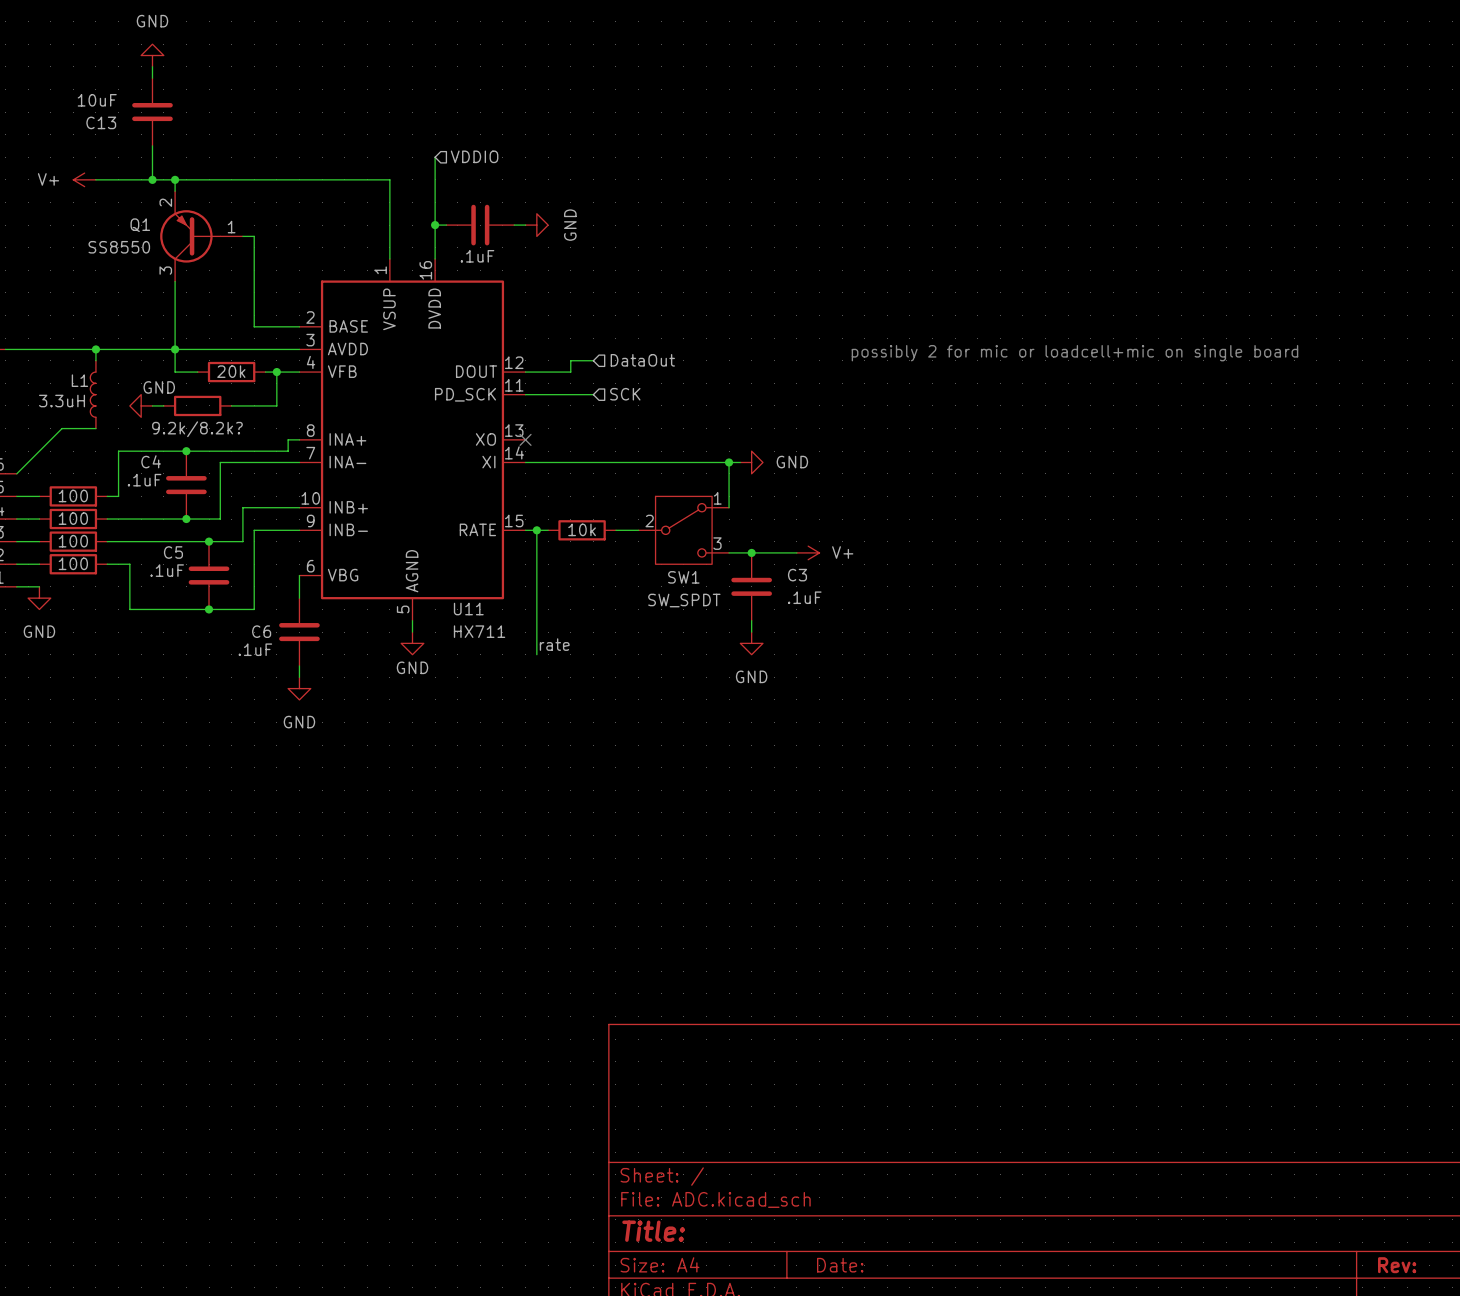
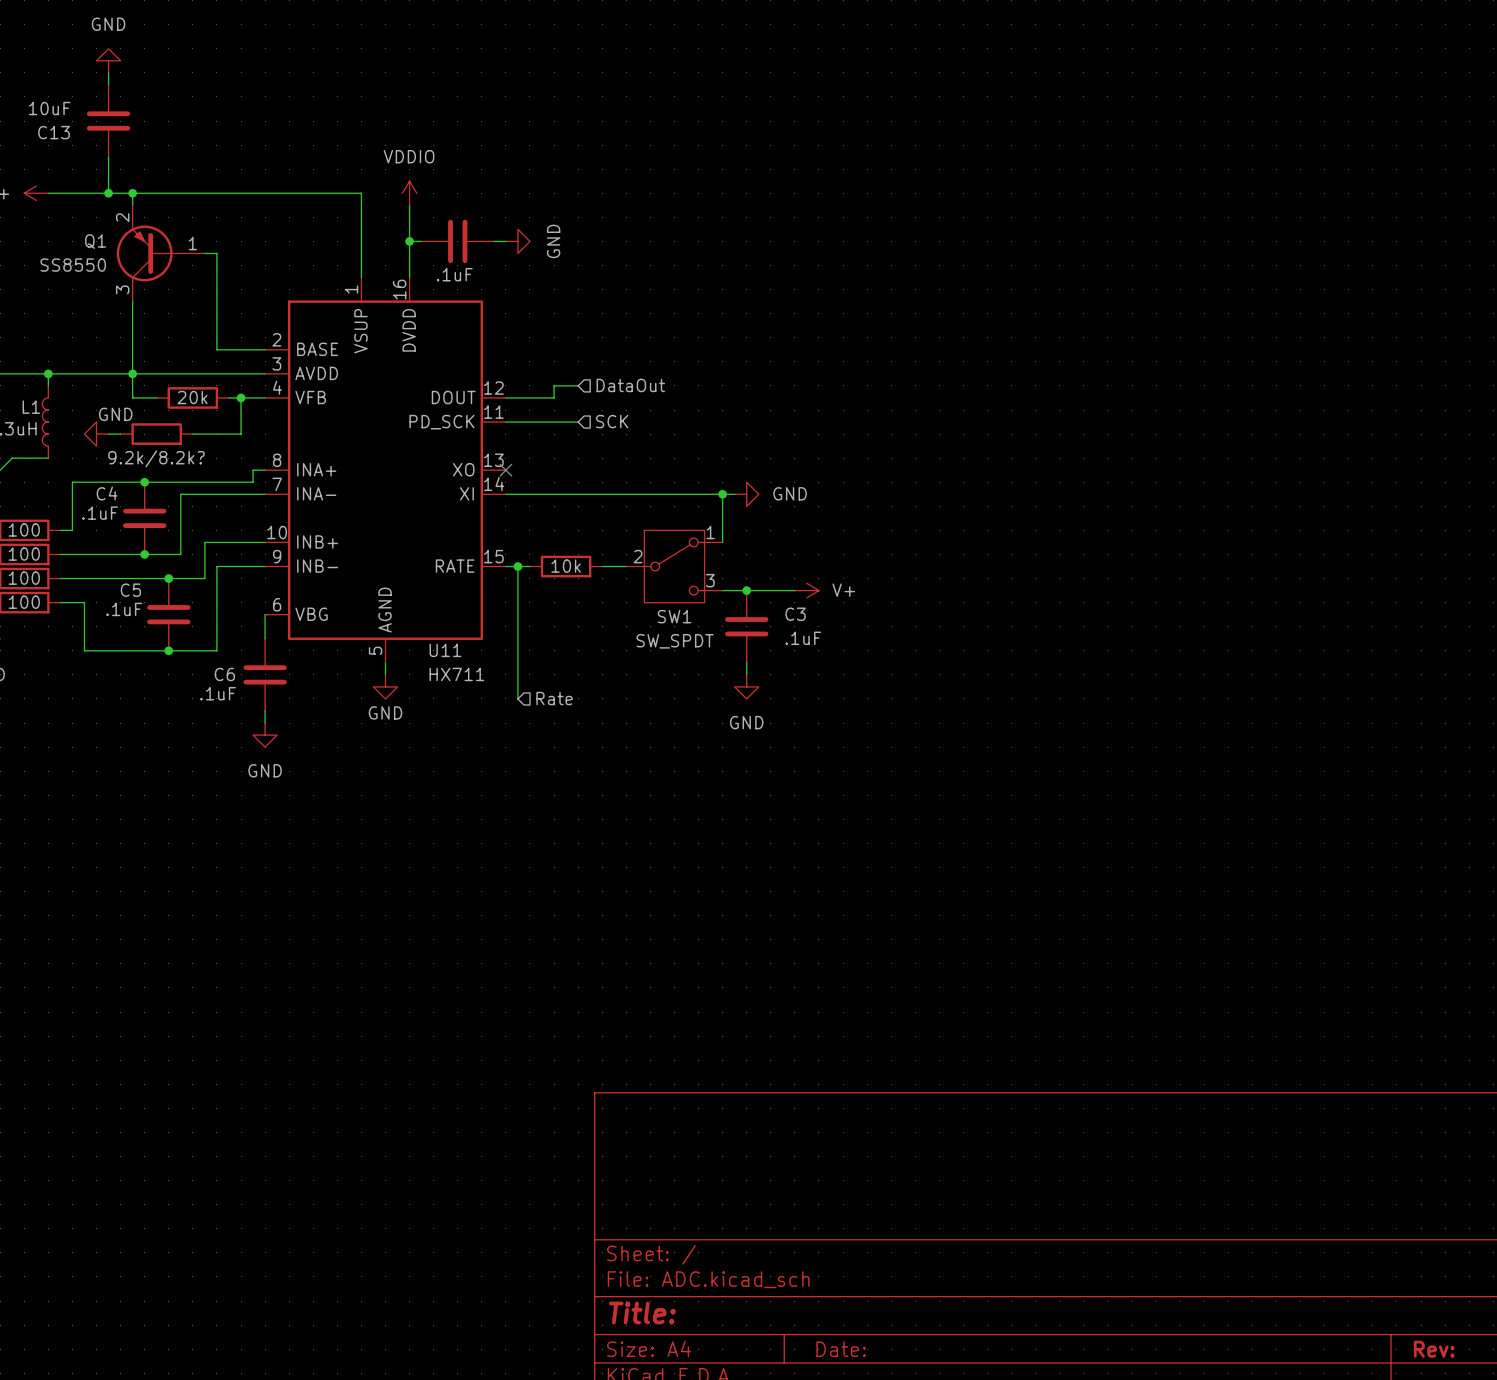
hierarchical label: VDDIO (474, 156) -> none
power symbol: none -> VDDIO (409, 193)
text: possibly 2 for mic or loadcell+mic on single board (1074, 353) -> none
label: rate (554, 644) -> none
hierarchical label: none -> Rate (554, 698)

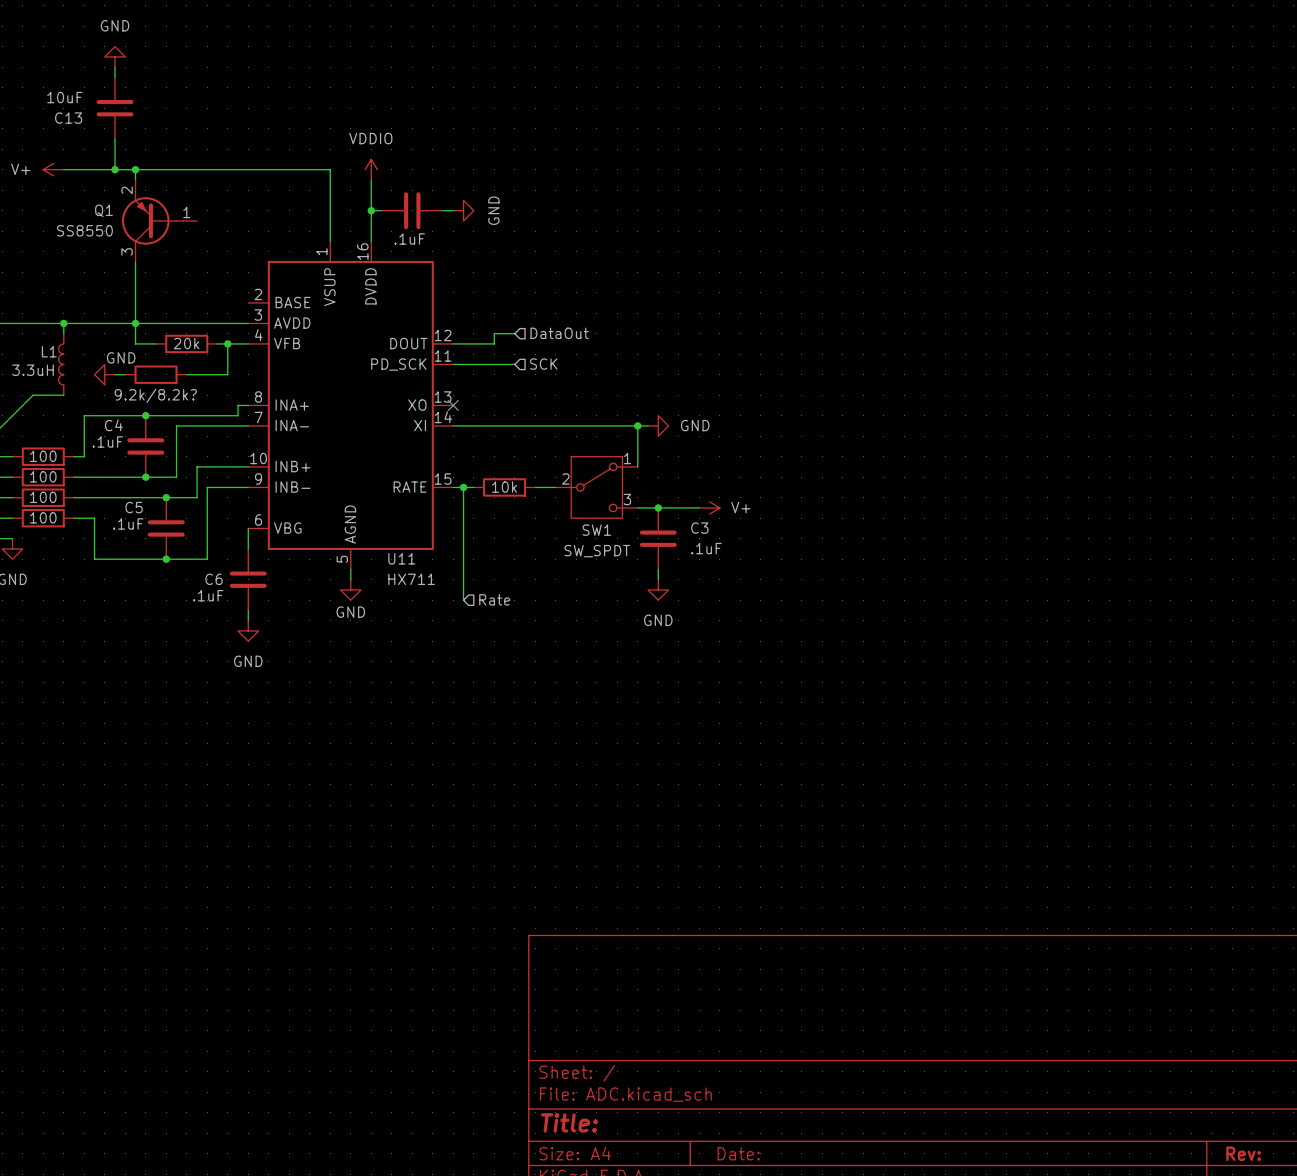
wire: (204, 253) (216, 253) (216, 349) (265, 349) -> none

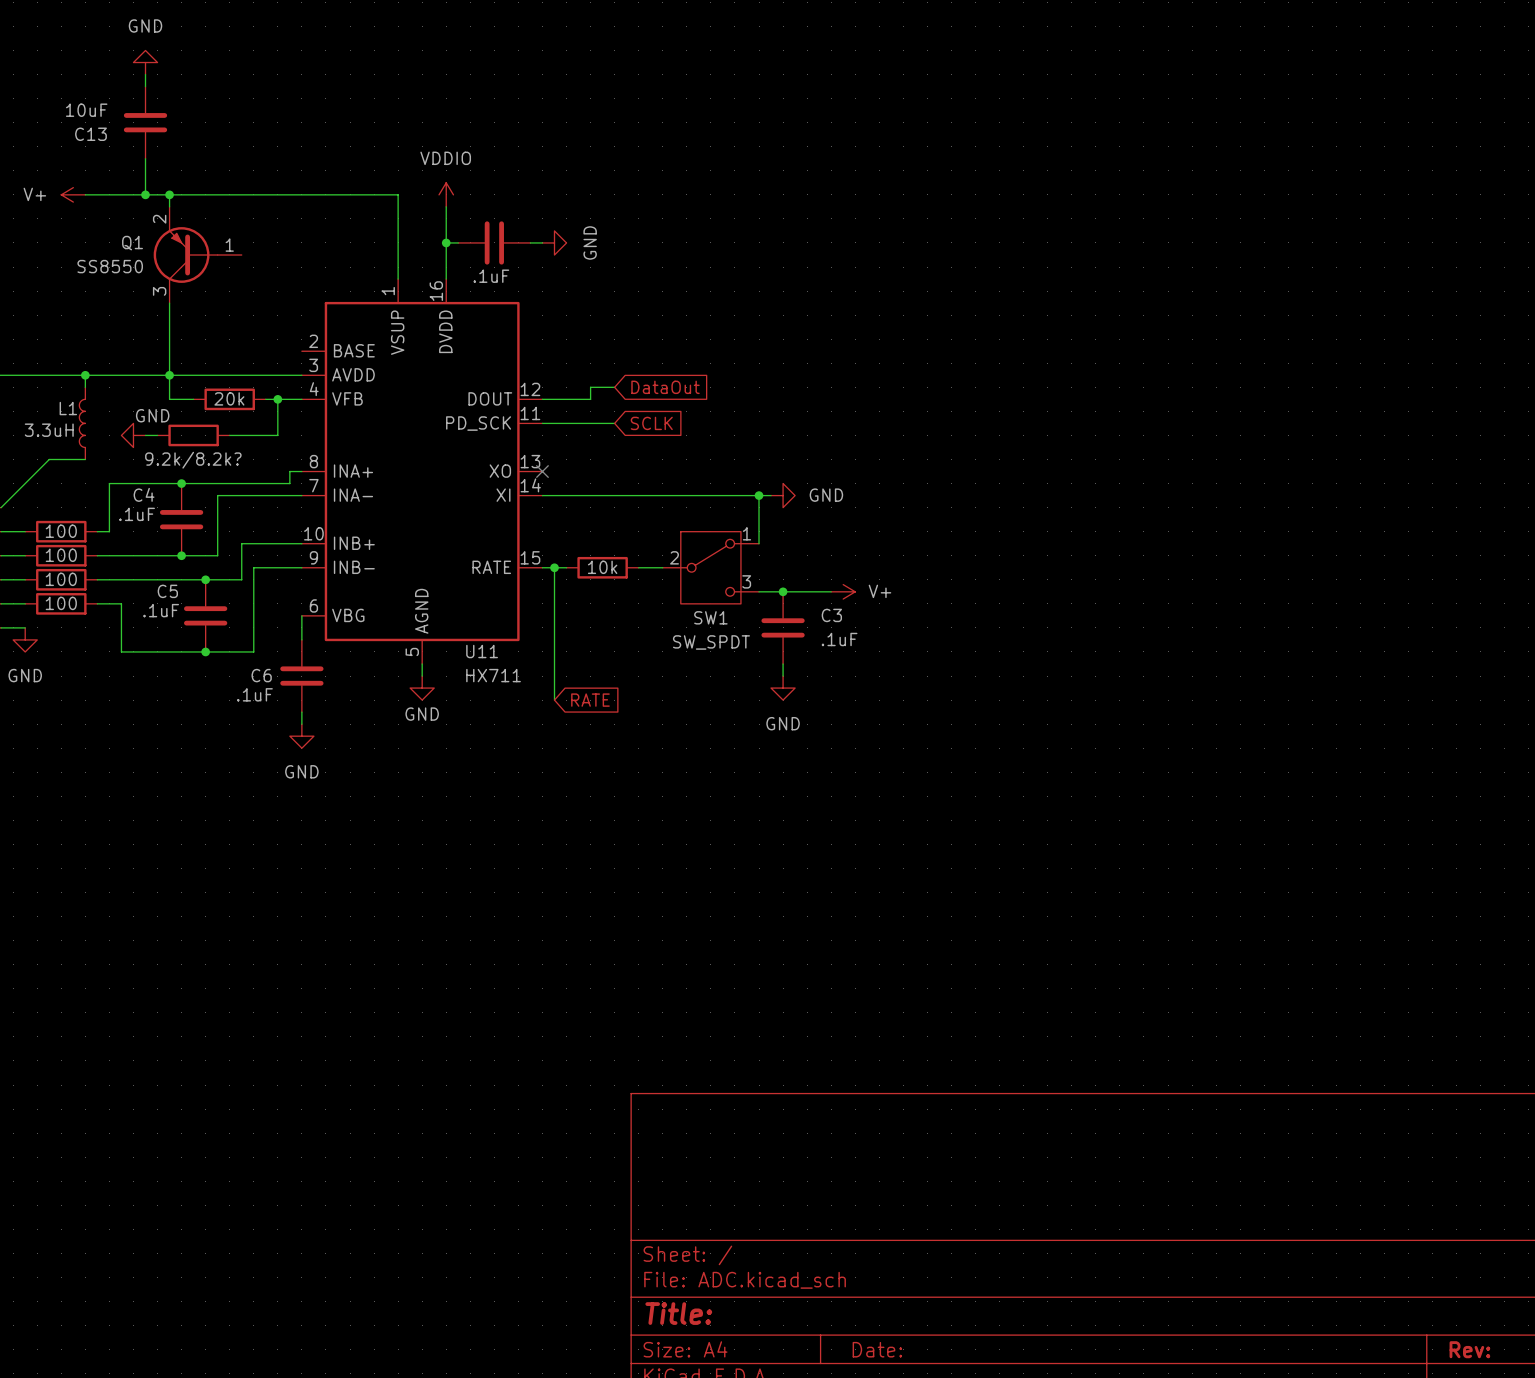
global label: none -> DataOut (665, 387)
hierarchical label: DataOut (559, 333) -> none
hierarchical label: SCK (543, 364) -> none
global label: none -> SCLK (651, 423)
hierarchical label: Rate (494, 599) -> none
global label: none -> RATE (590, 700)

